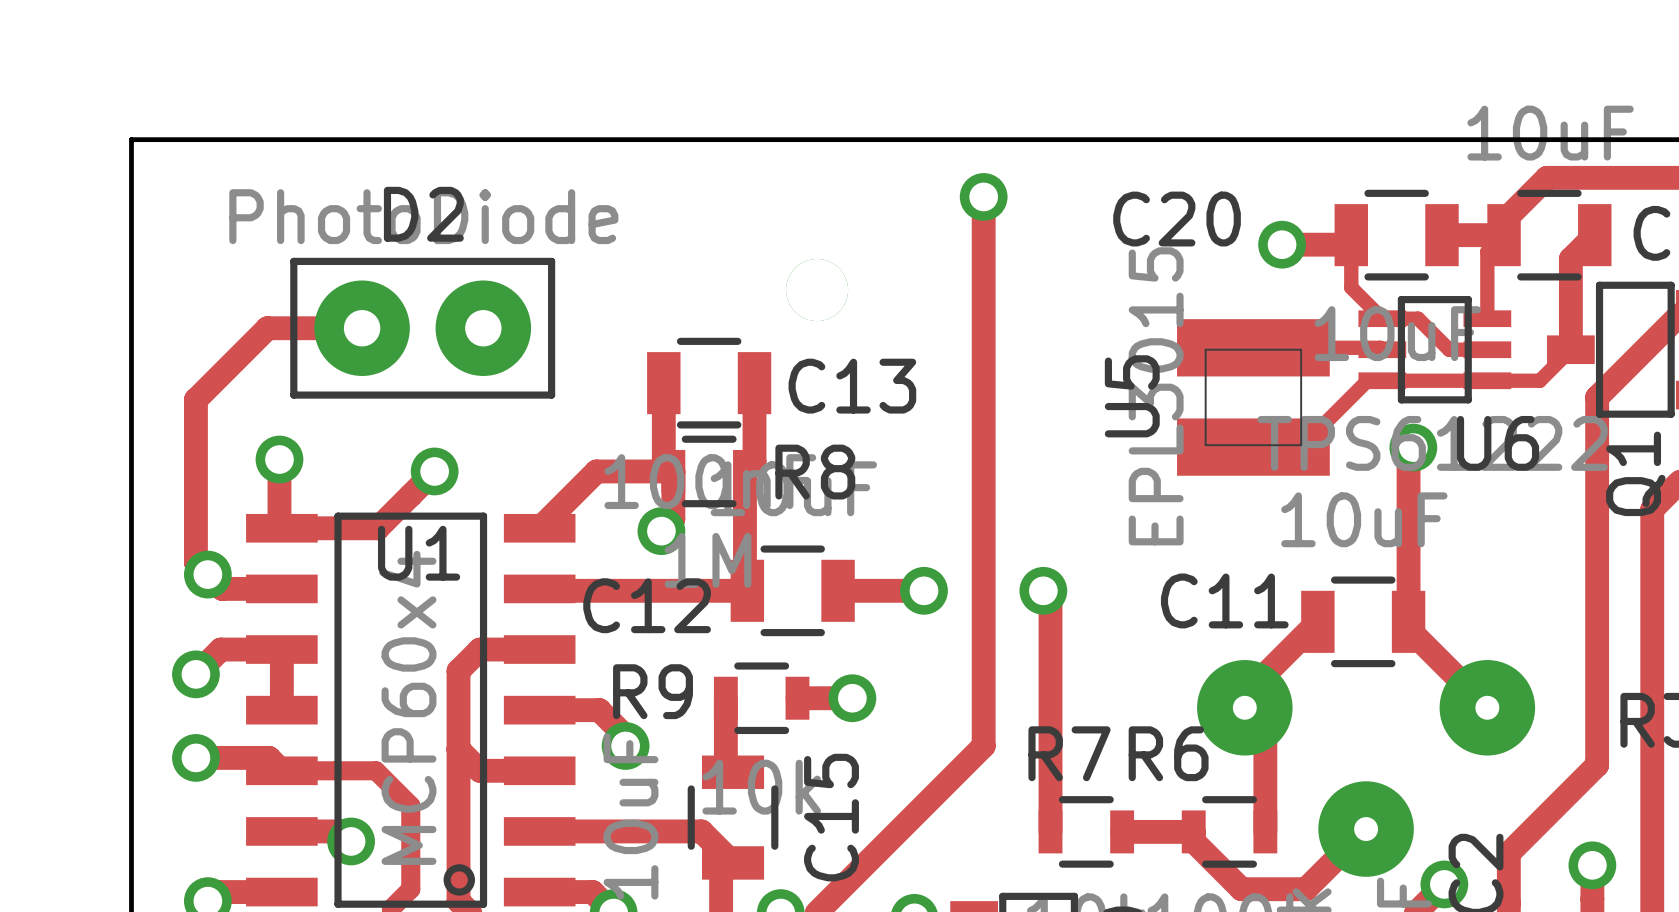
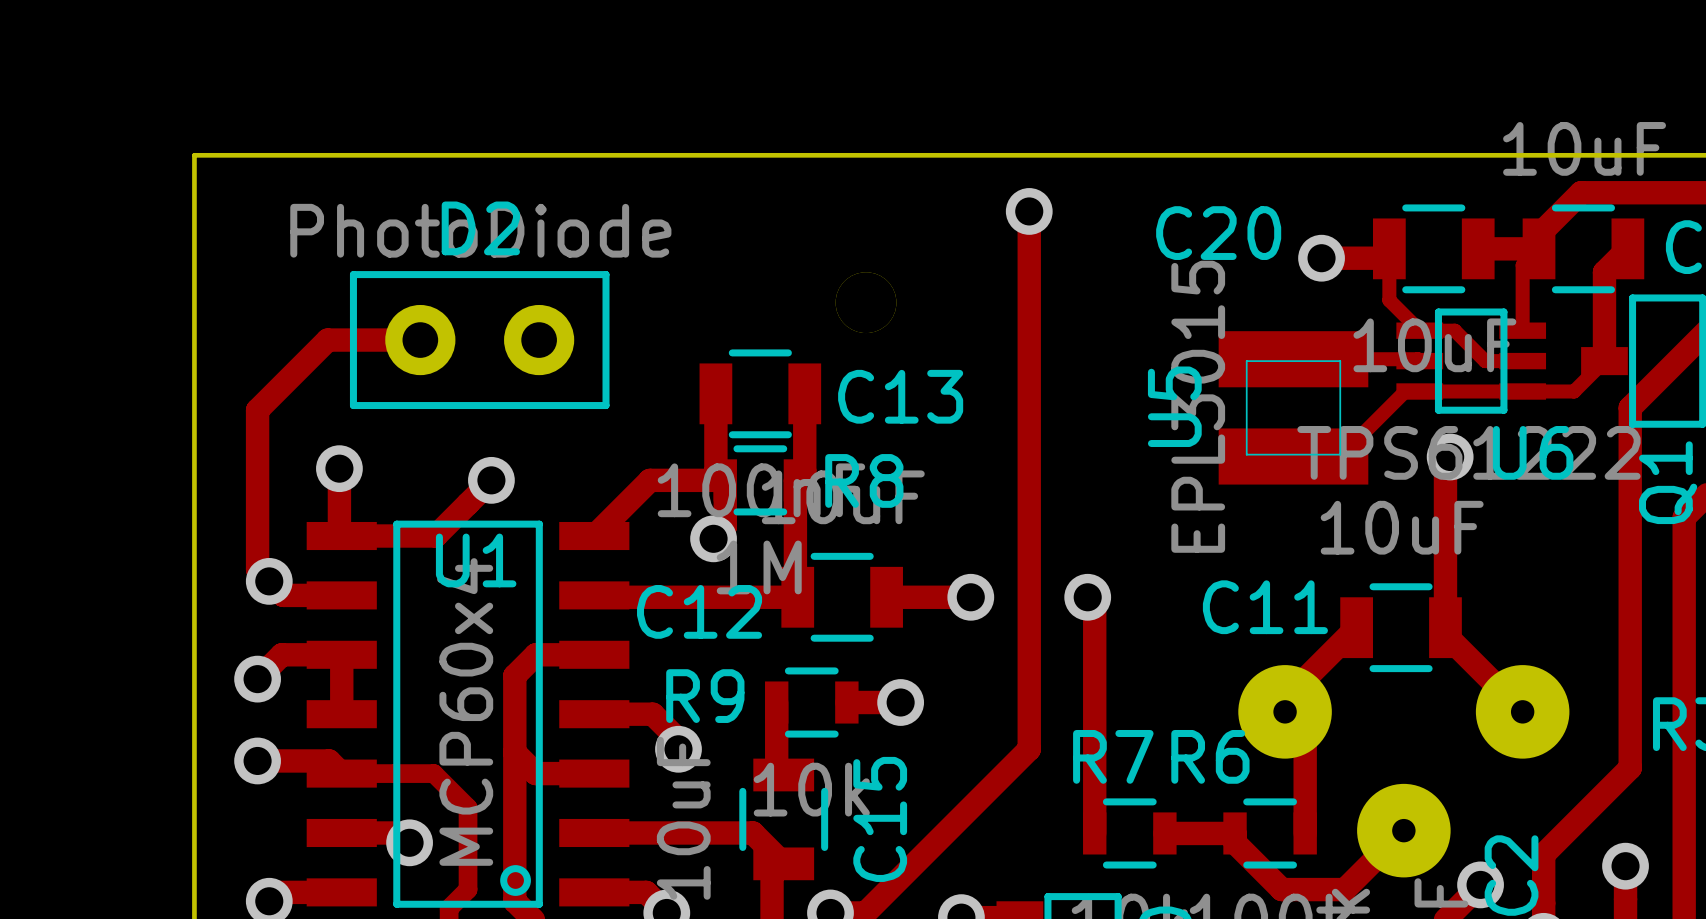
D2 footprint: [290, 257, 556, 399] -> [349, 271, 610, 410]

